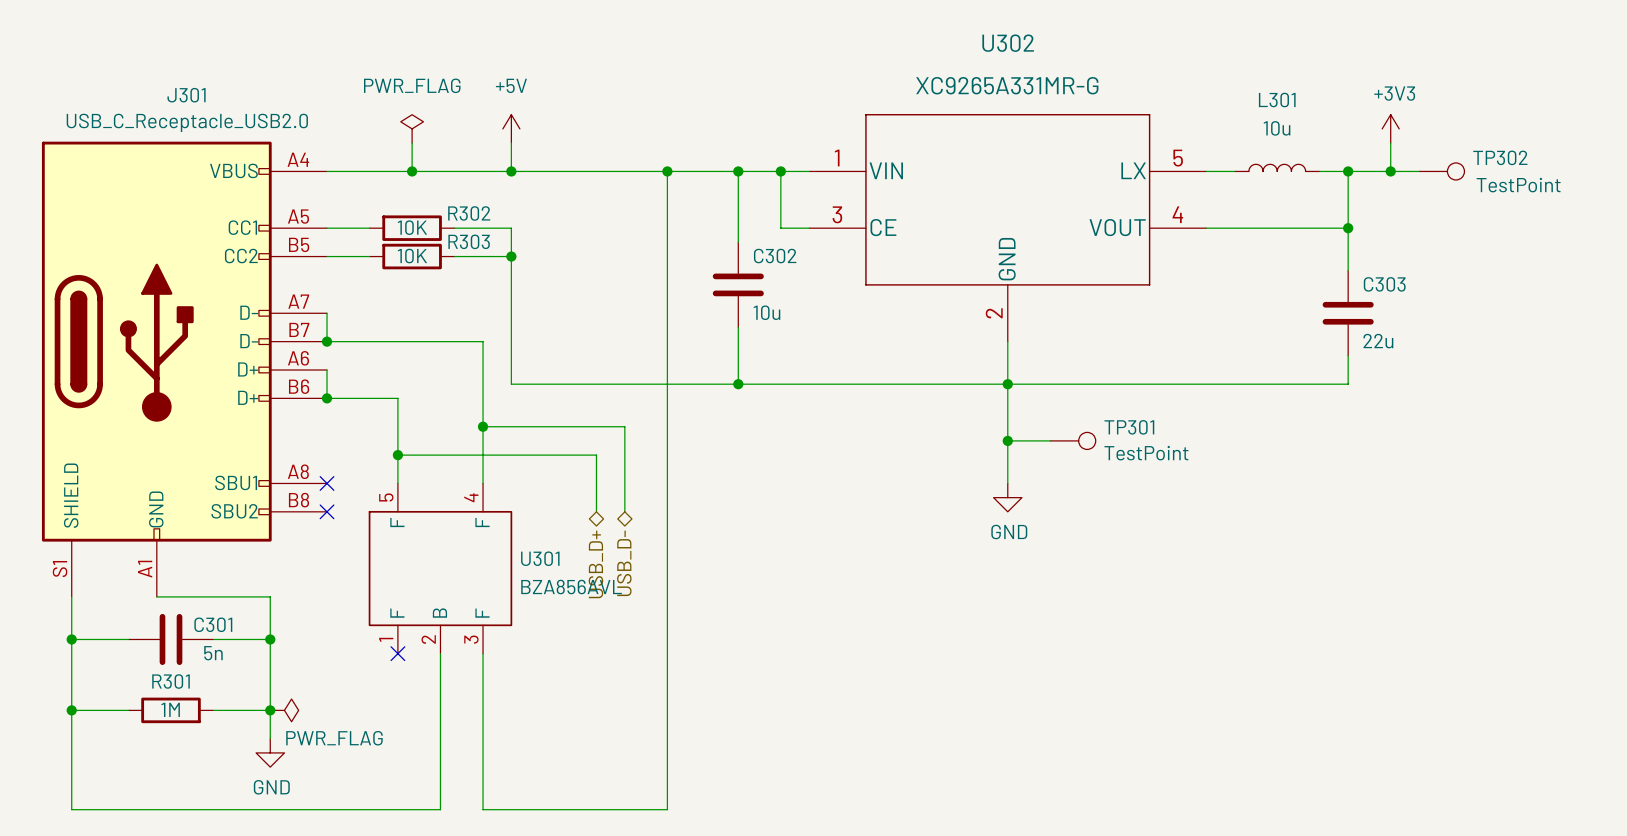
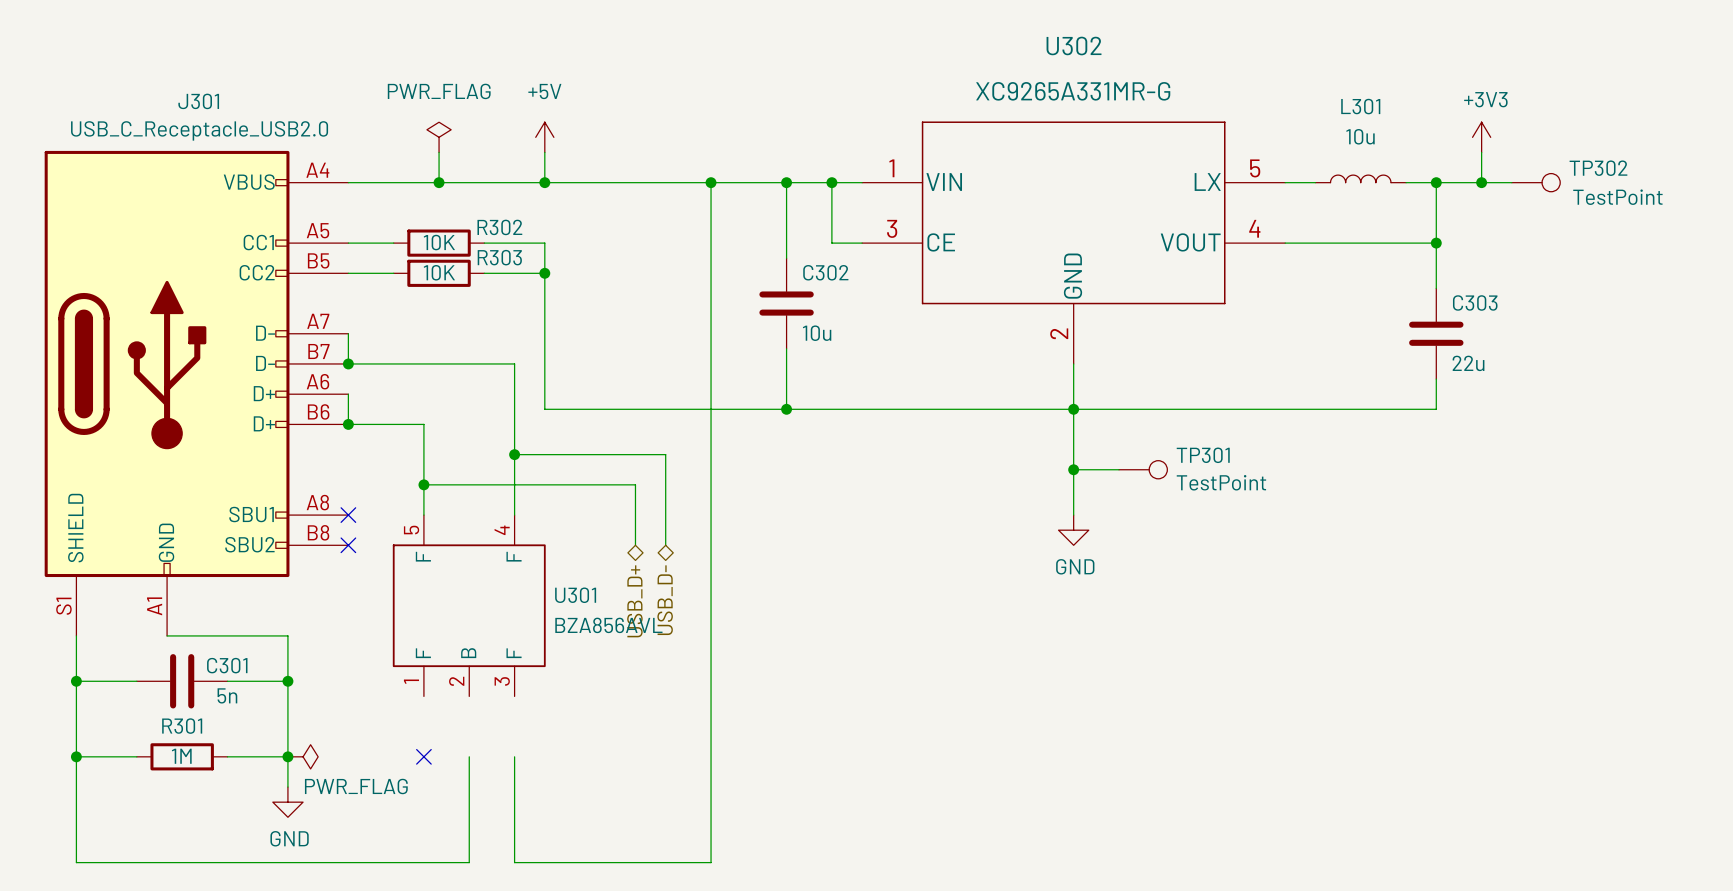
no-connect mark position: (397, 653) -> (423, 756)
wire: (440, 653) (440, 710) -> none
wire: (483, 653) (483, 710) -> none

